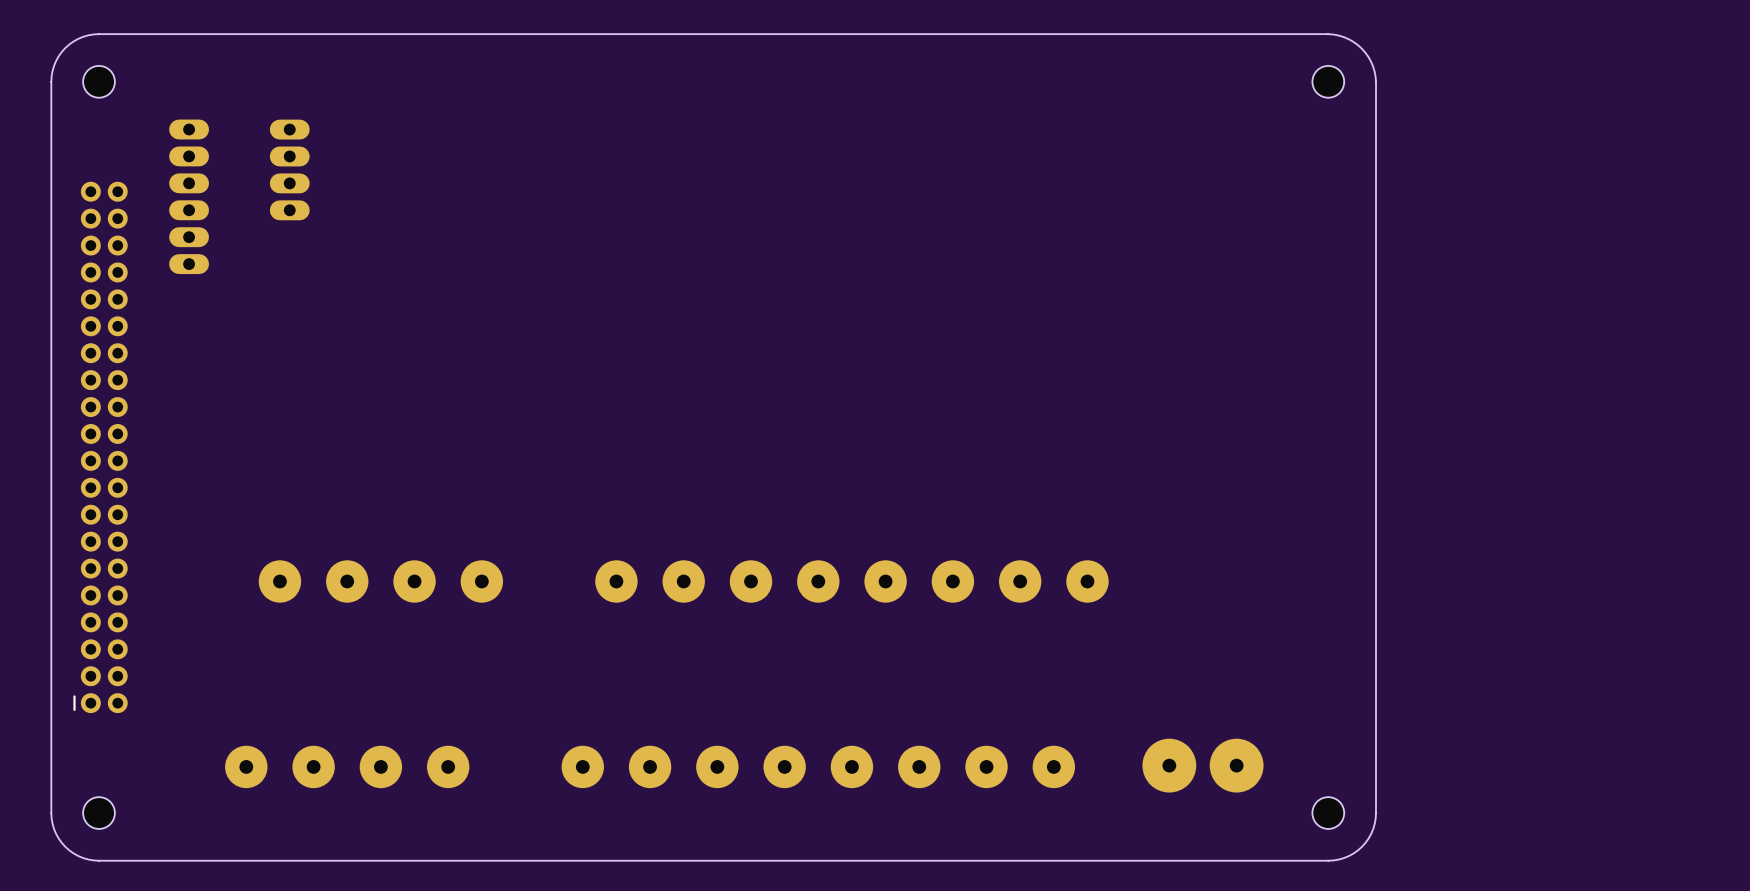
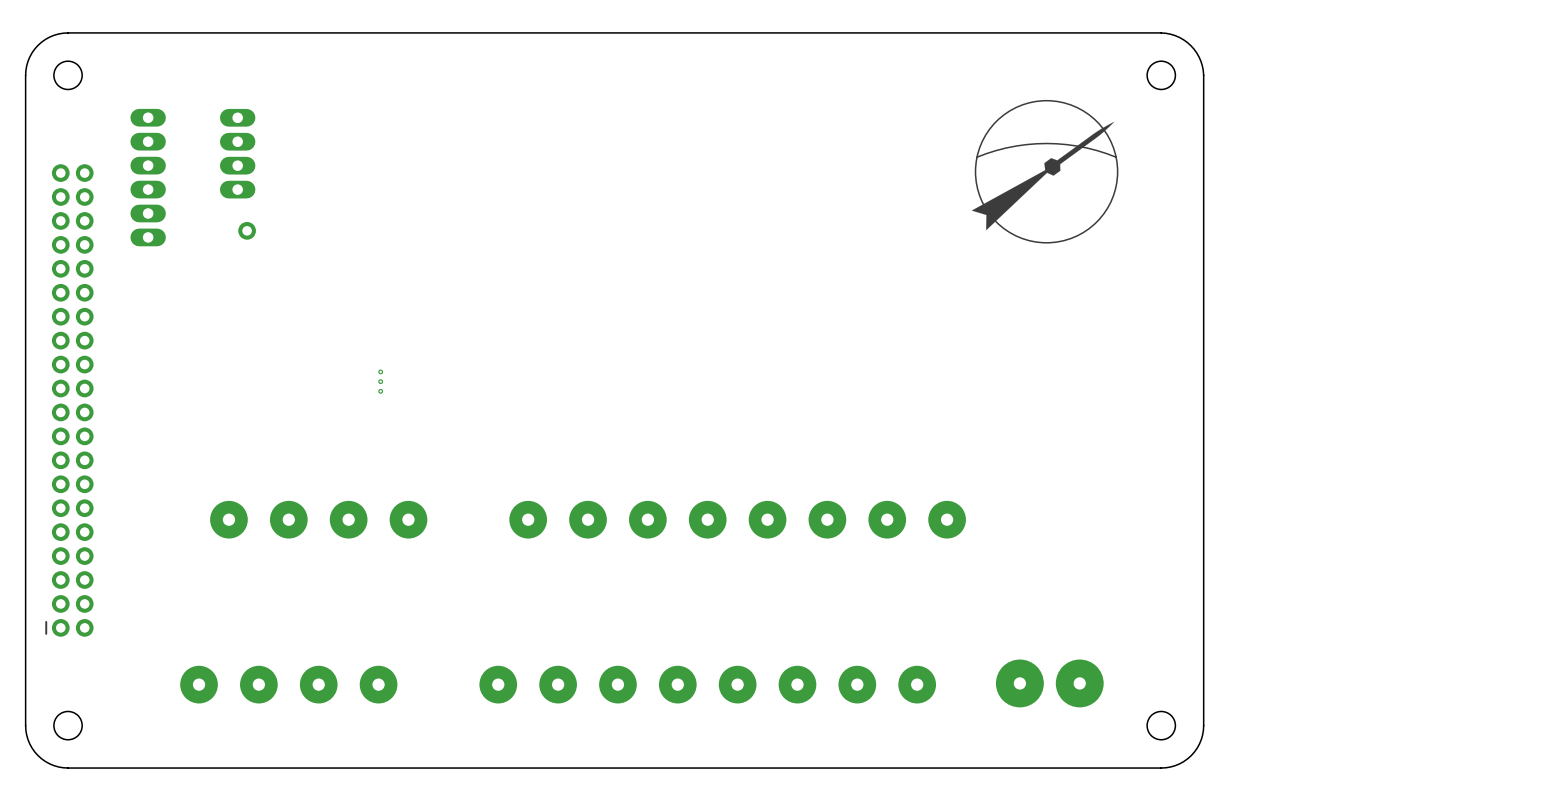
drawing: none -> [971, 100, 1119, 244]
part: none -> (247, 230)
part: none -> (380, 381)

